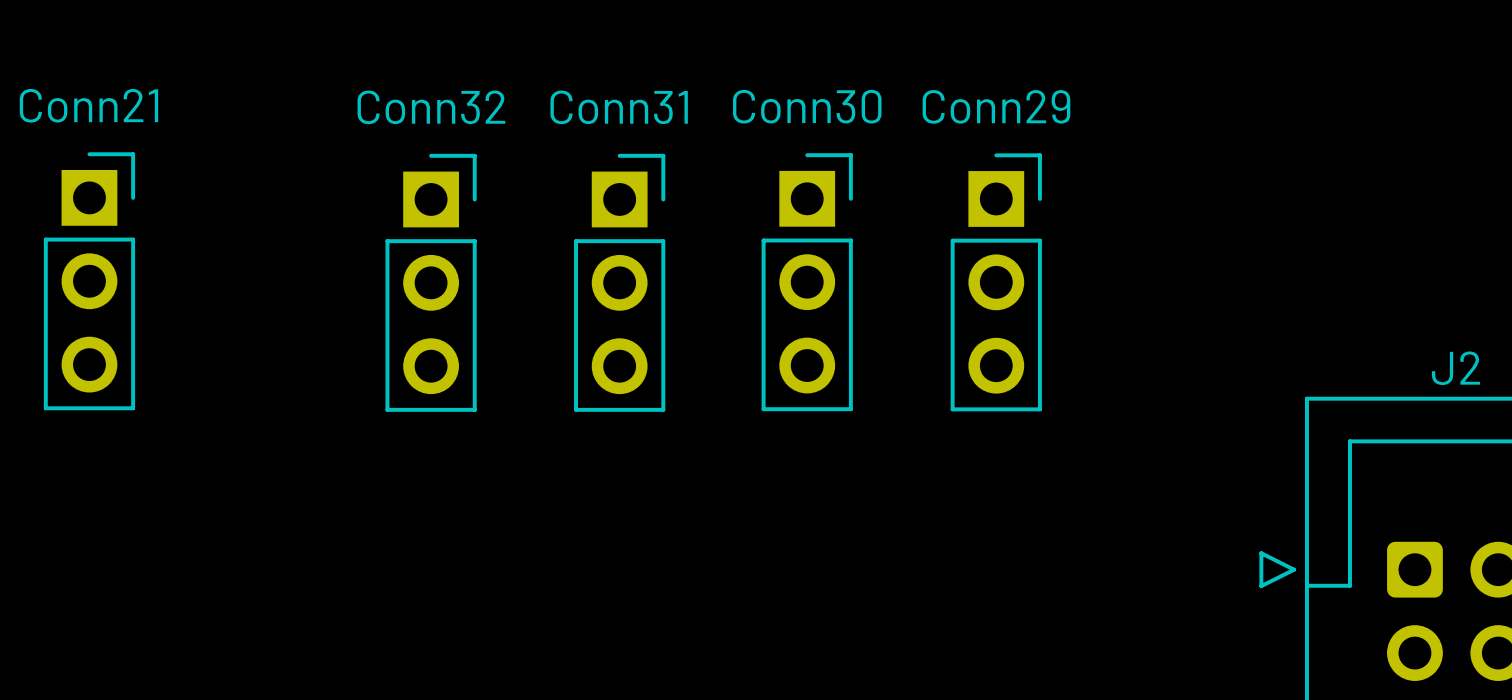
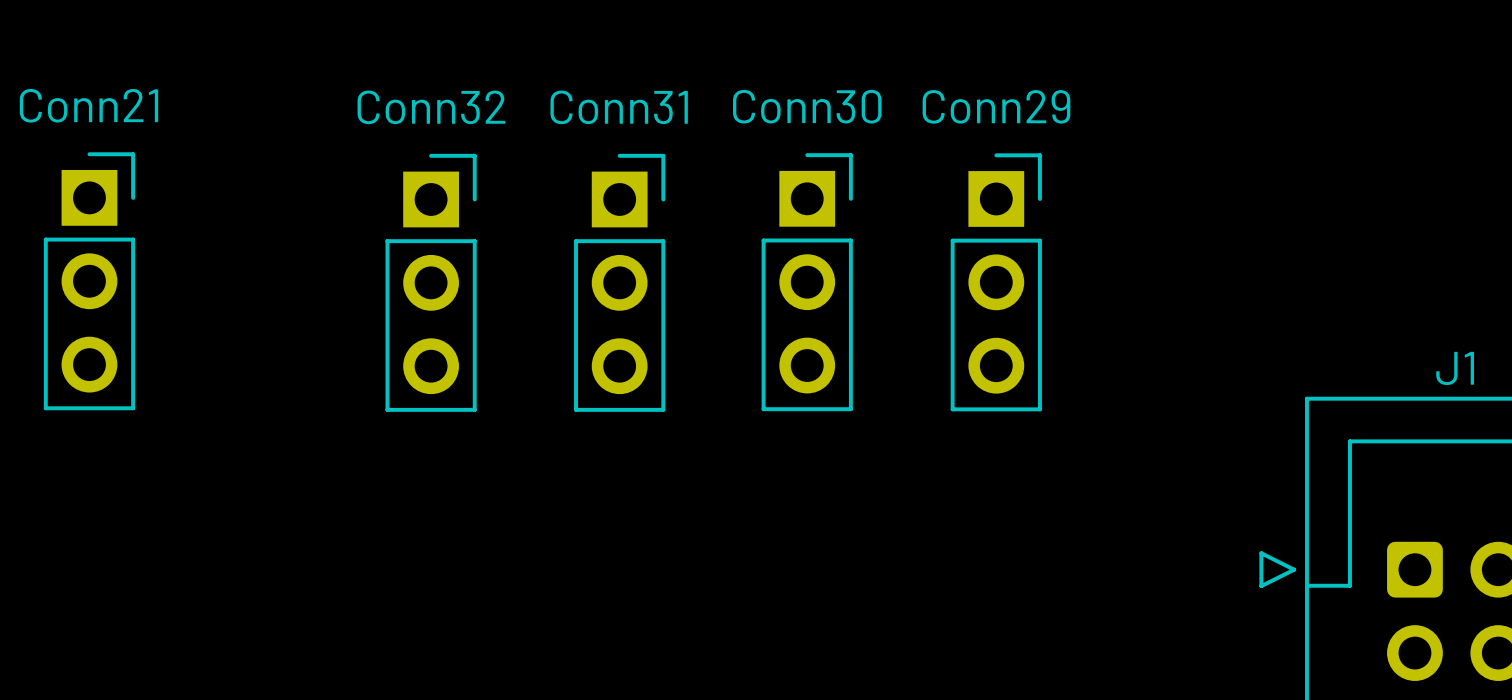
J2 name: J2 (1455, 368) -> J1 (1455, 368)

